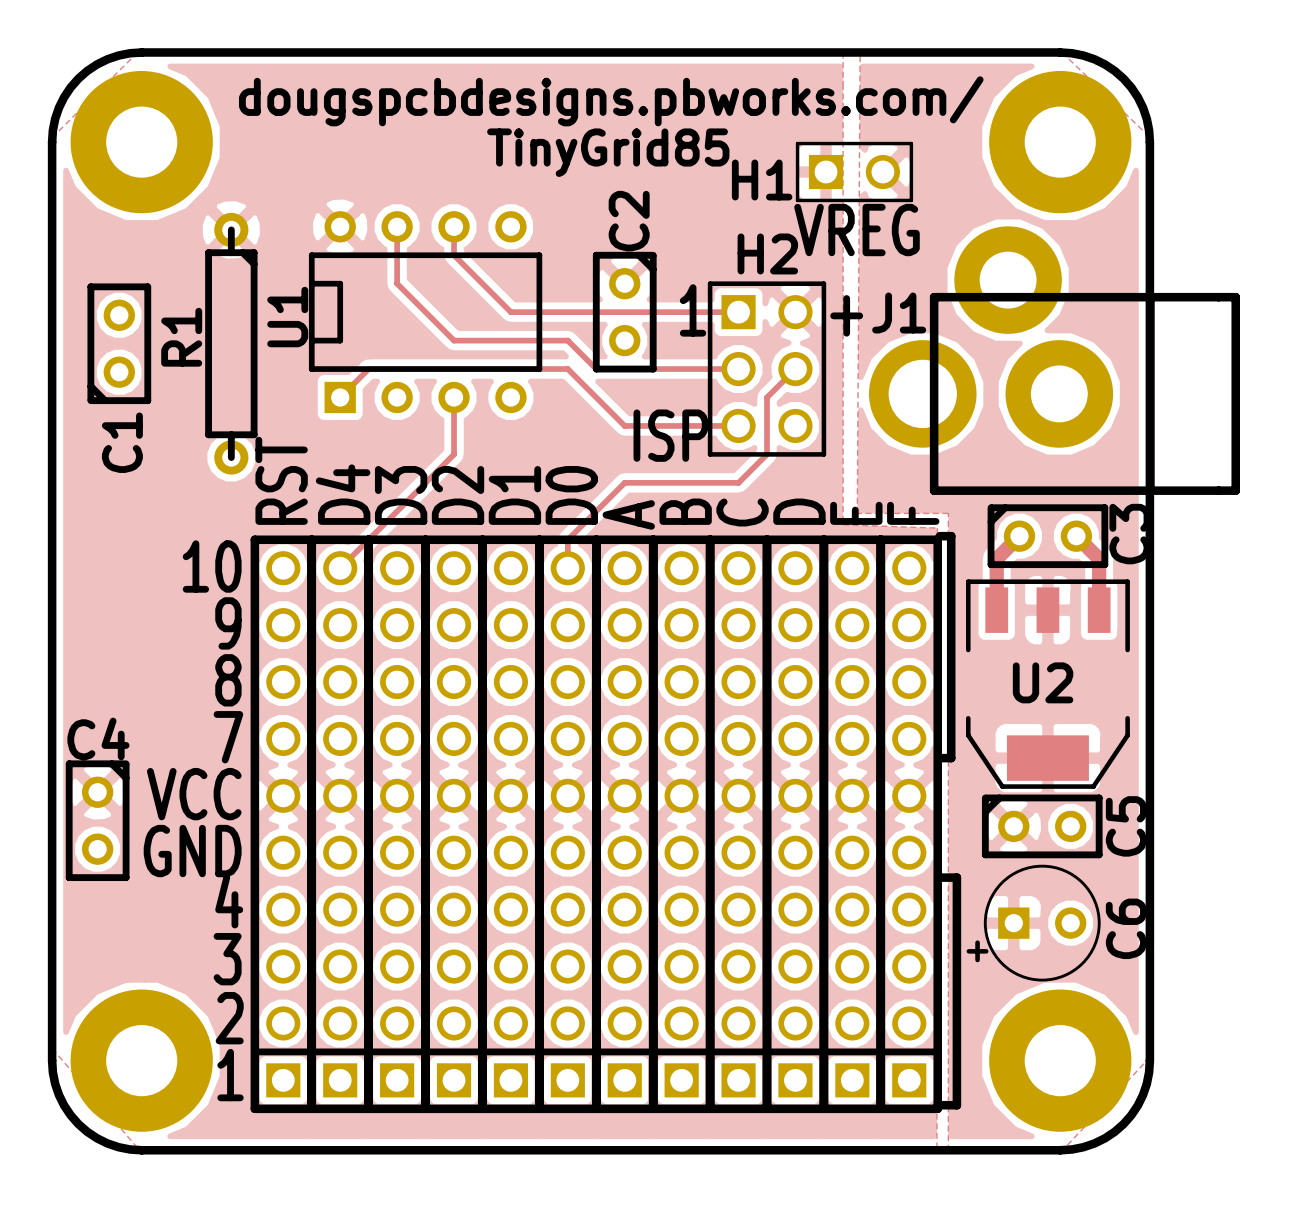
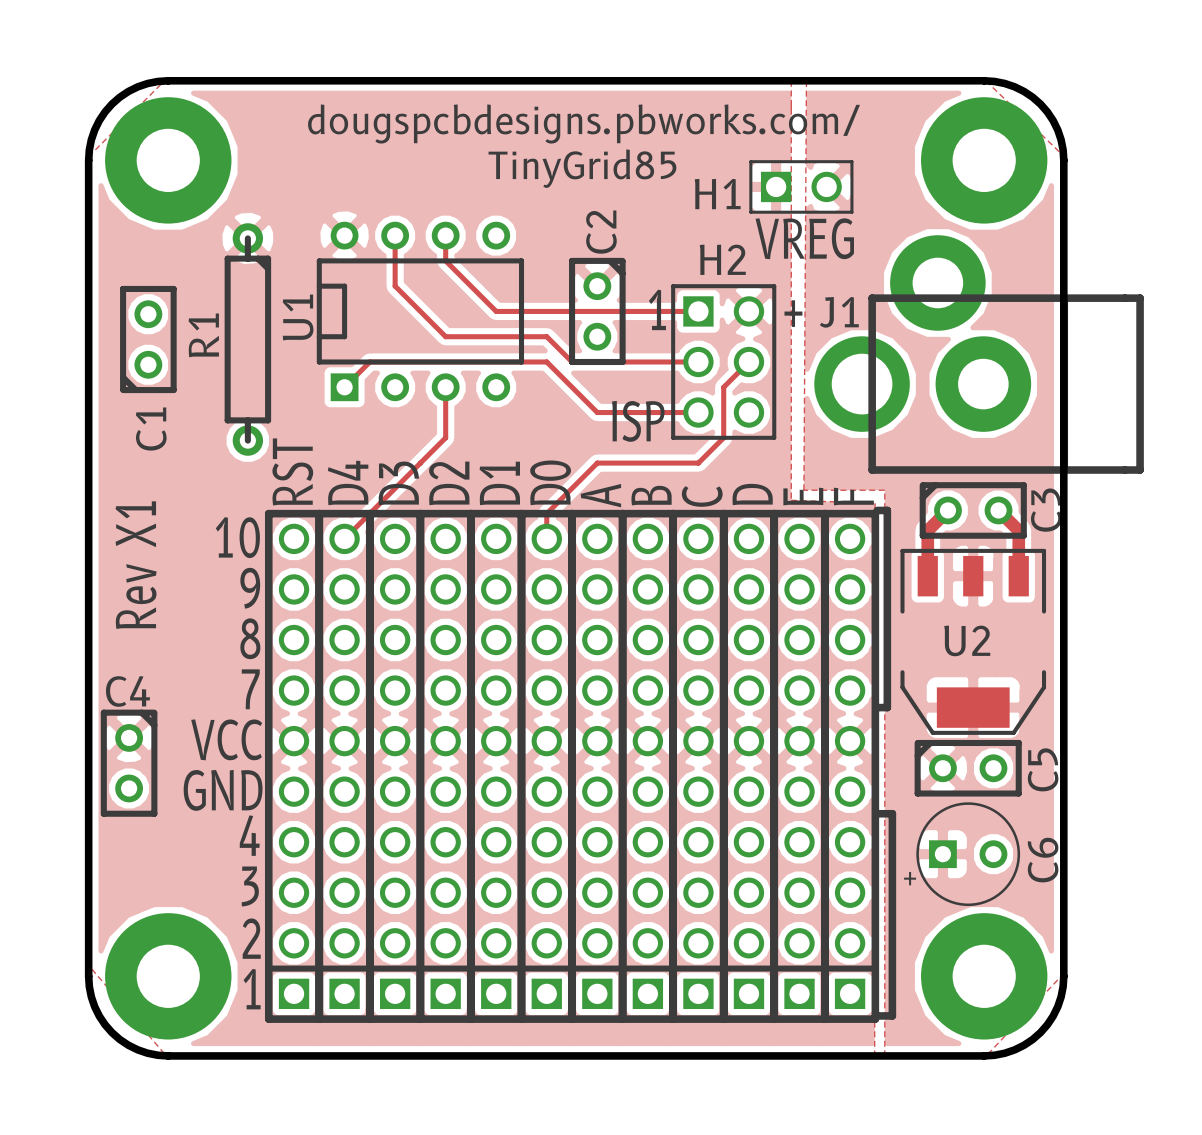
text: none -> Rev X1 (136, 565)

